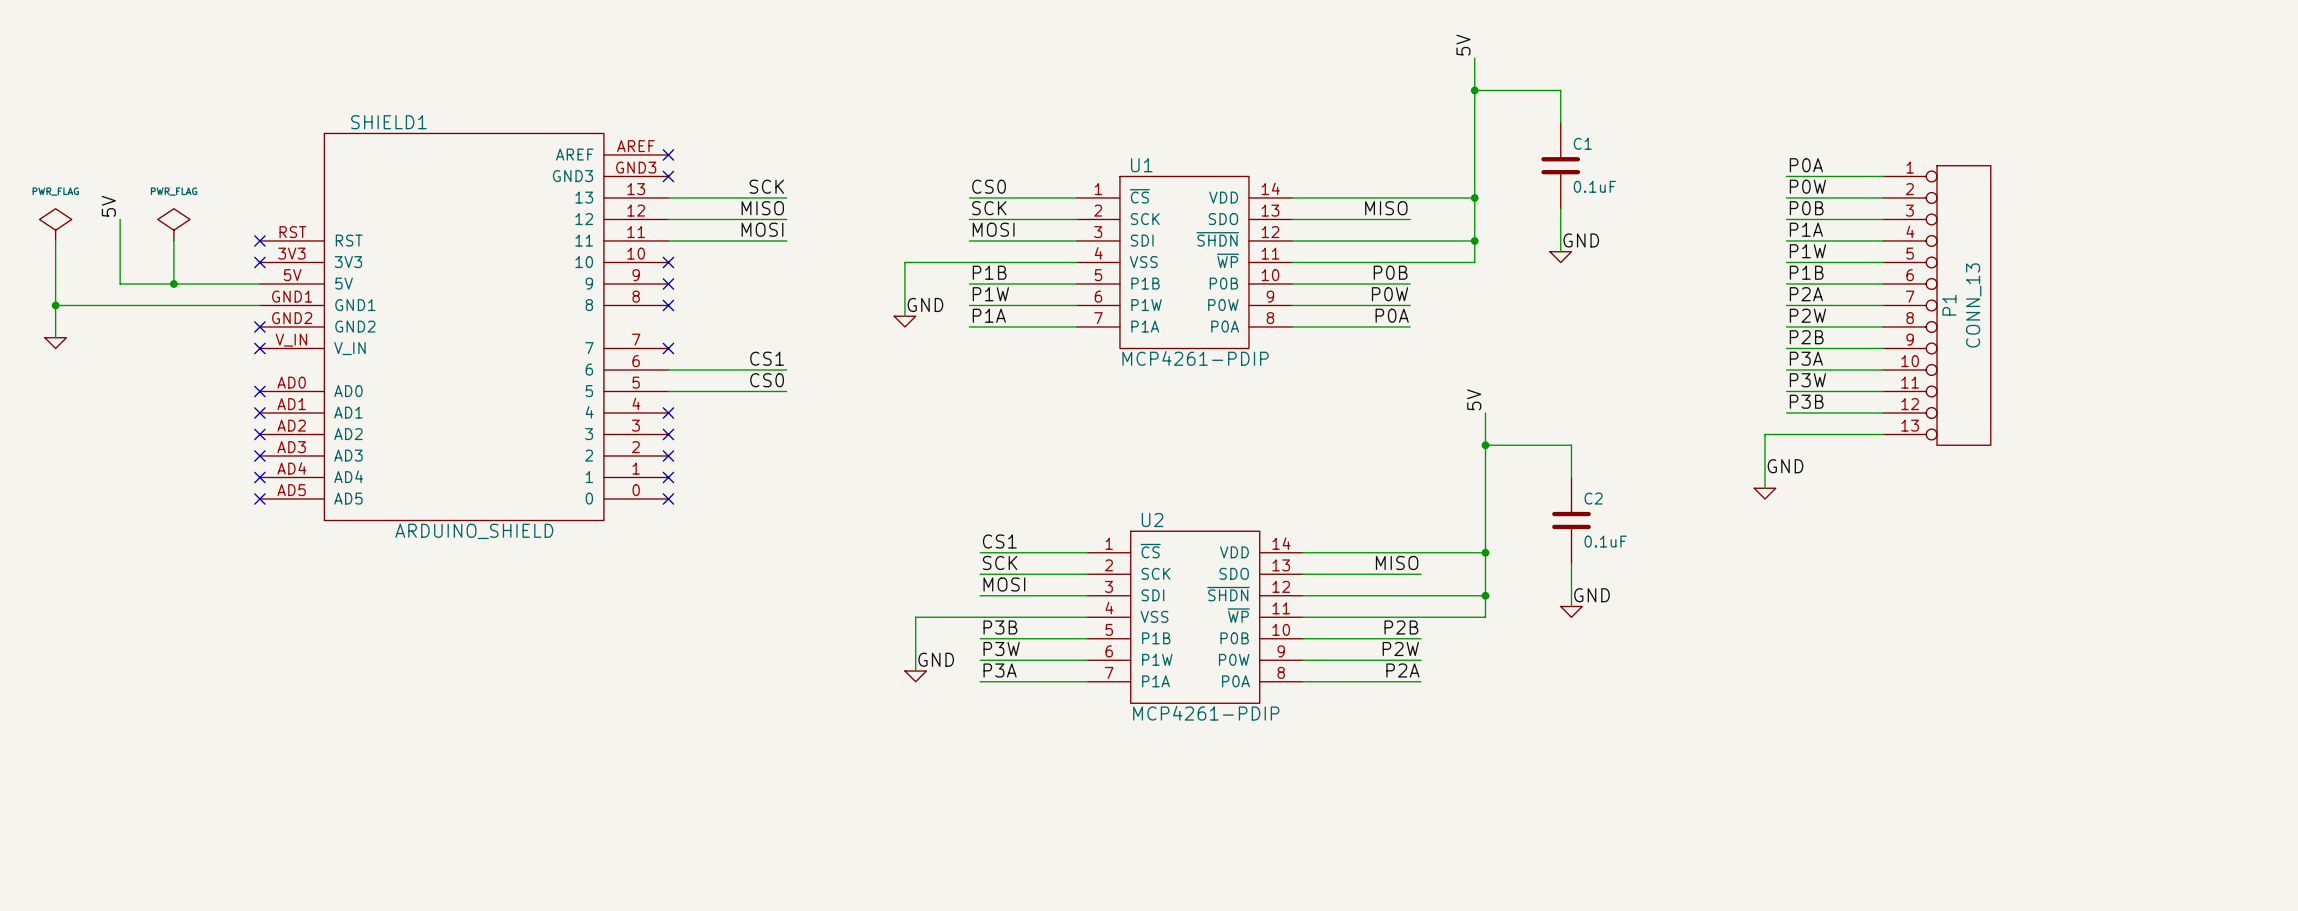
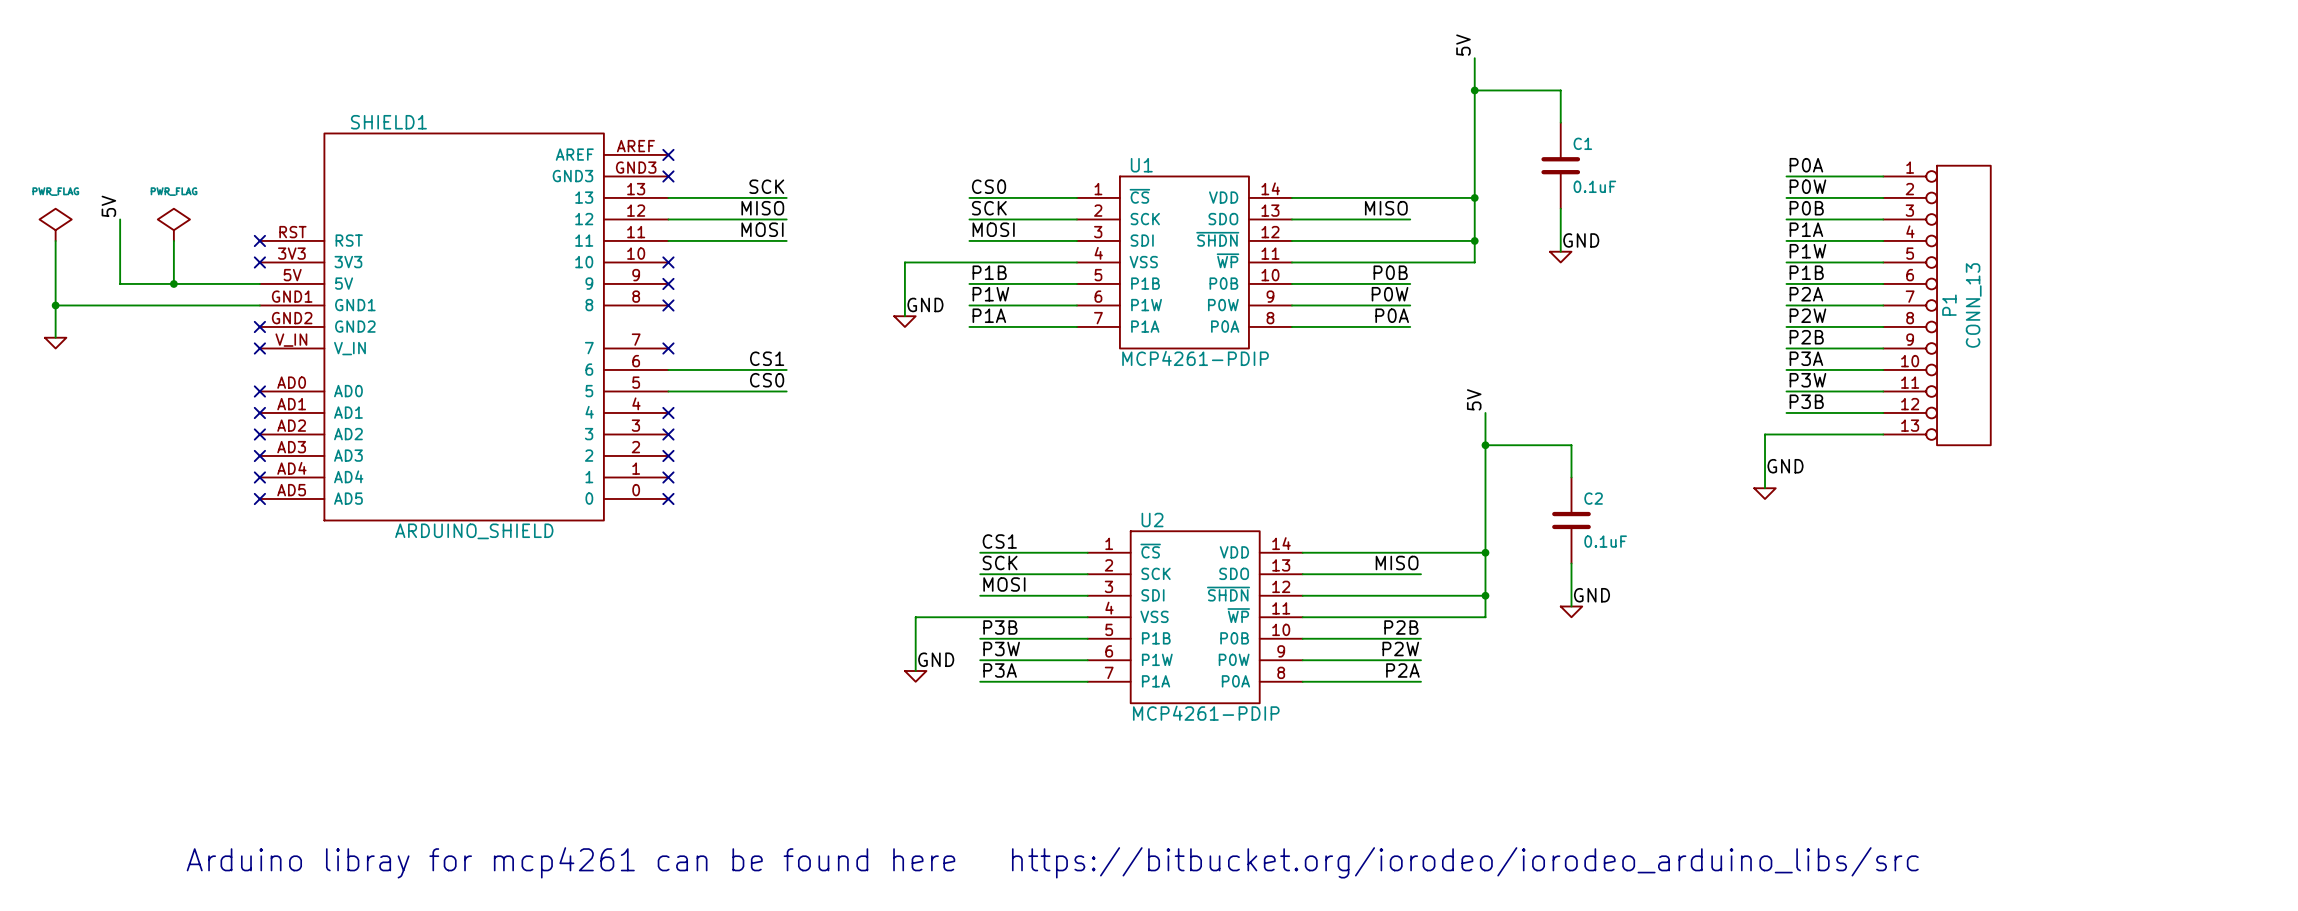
text: none -> Arduino libray for mcp4261 can be found here https://bitbucket.org/iorodeo/iorodeo_arduino_libs/src (1052, 862)

